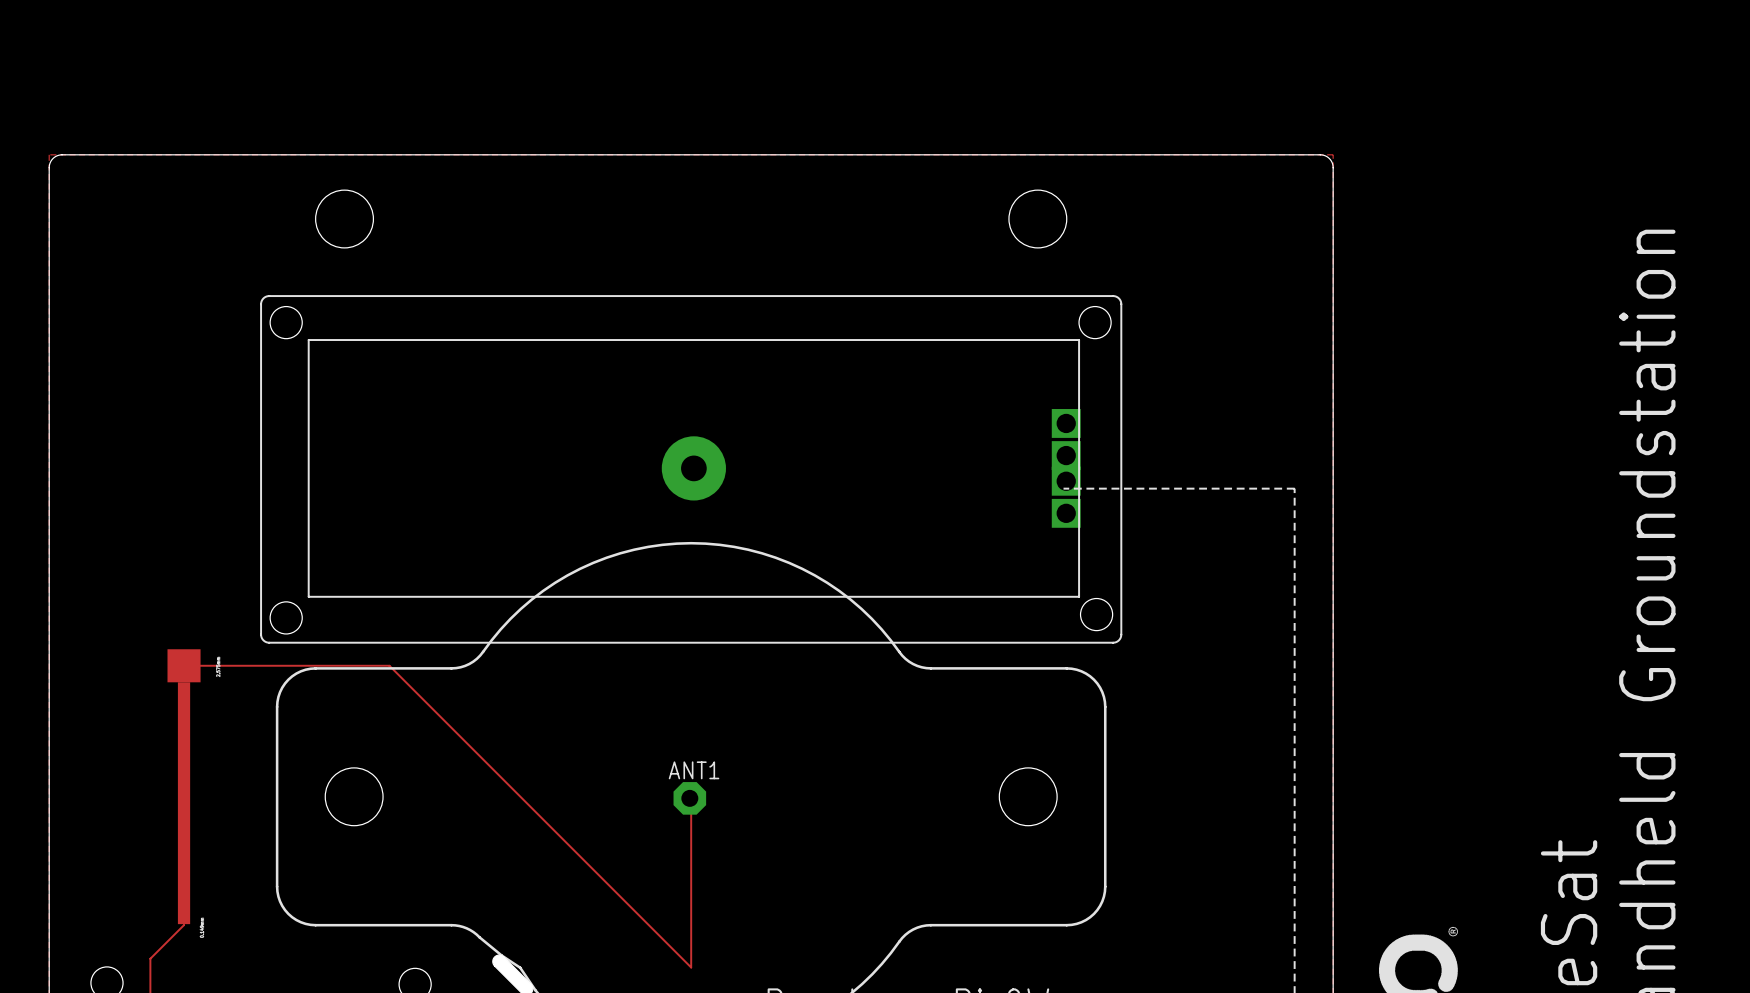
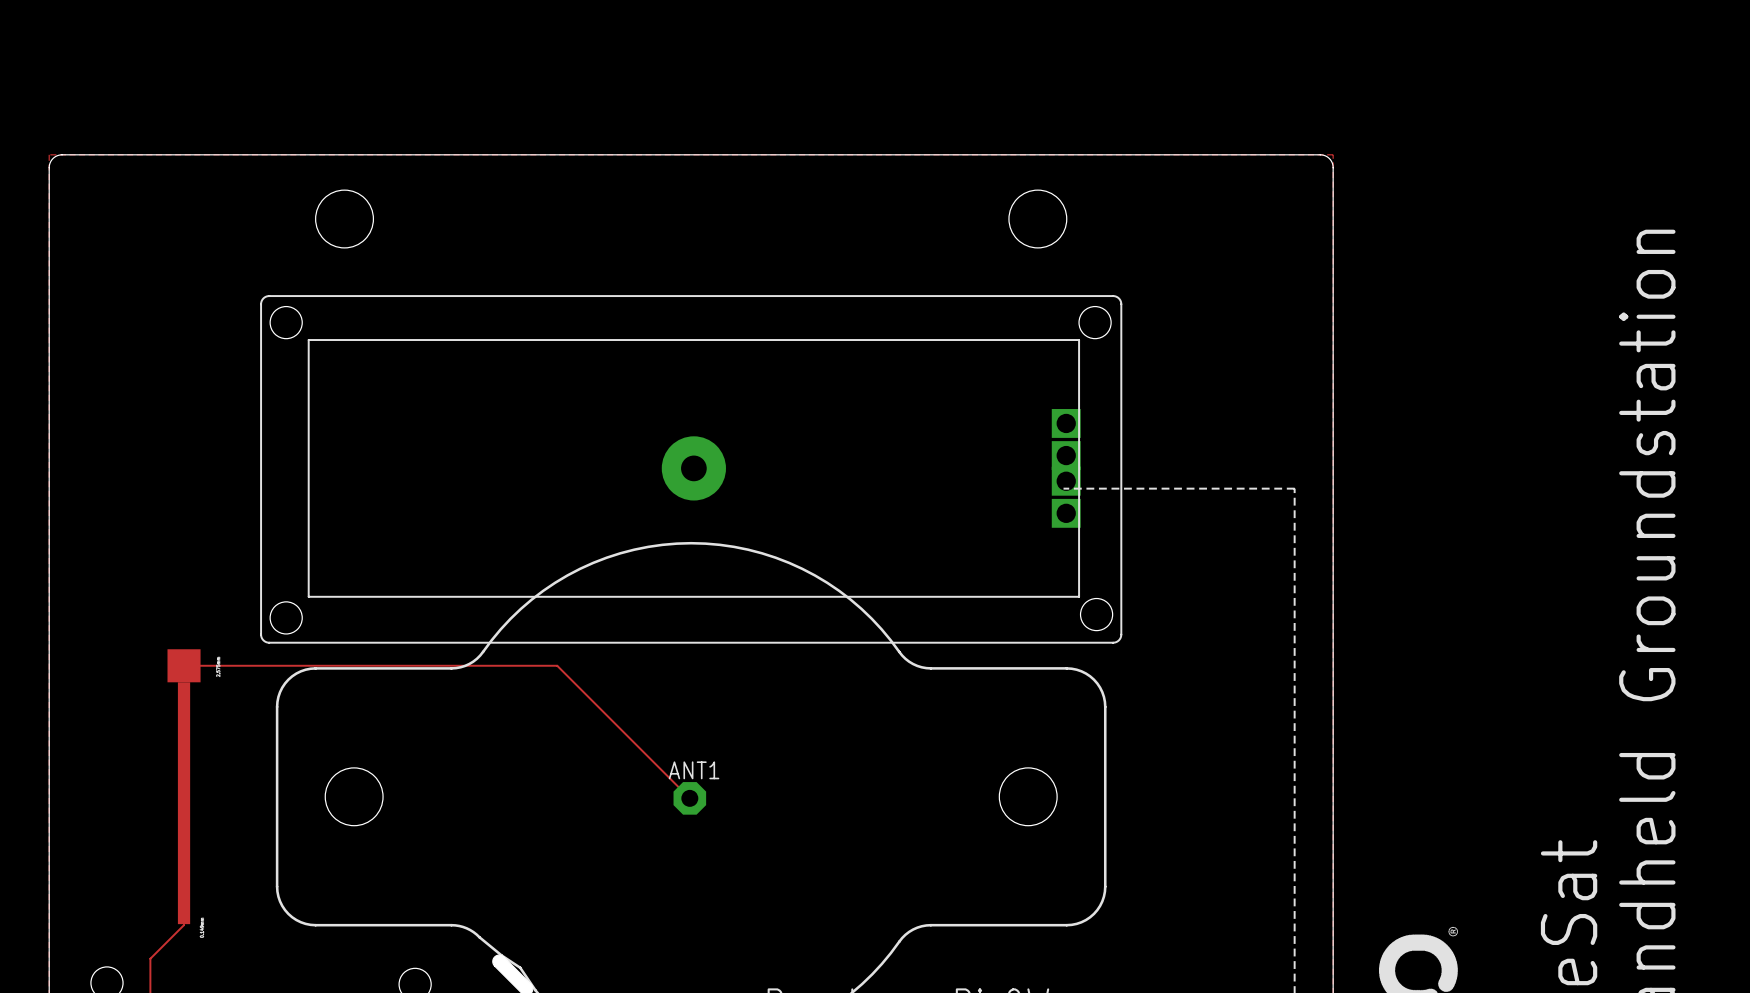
track: (389, 665) (691, 967) (689, 798) -> (389, 665) (557, 665) (689, 798)

